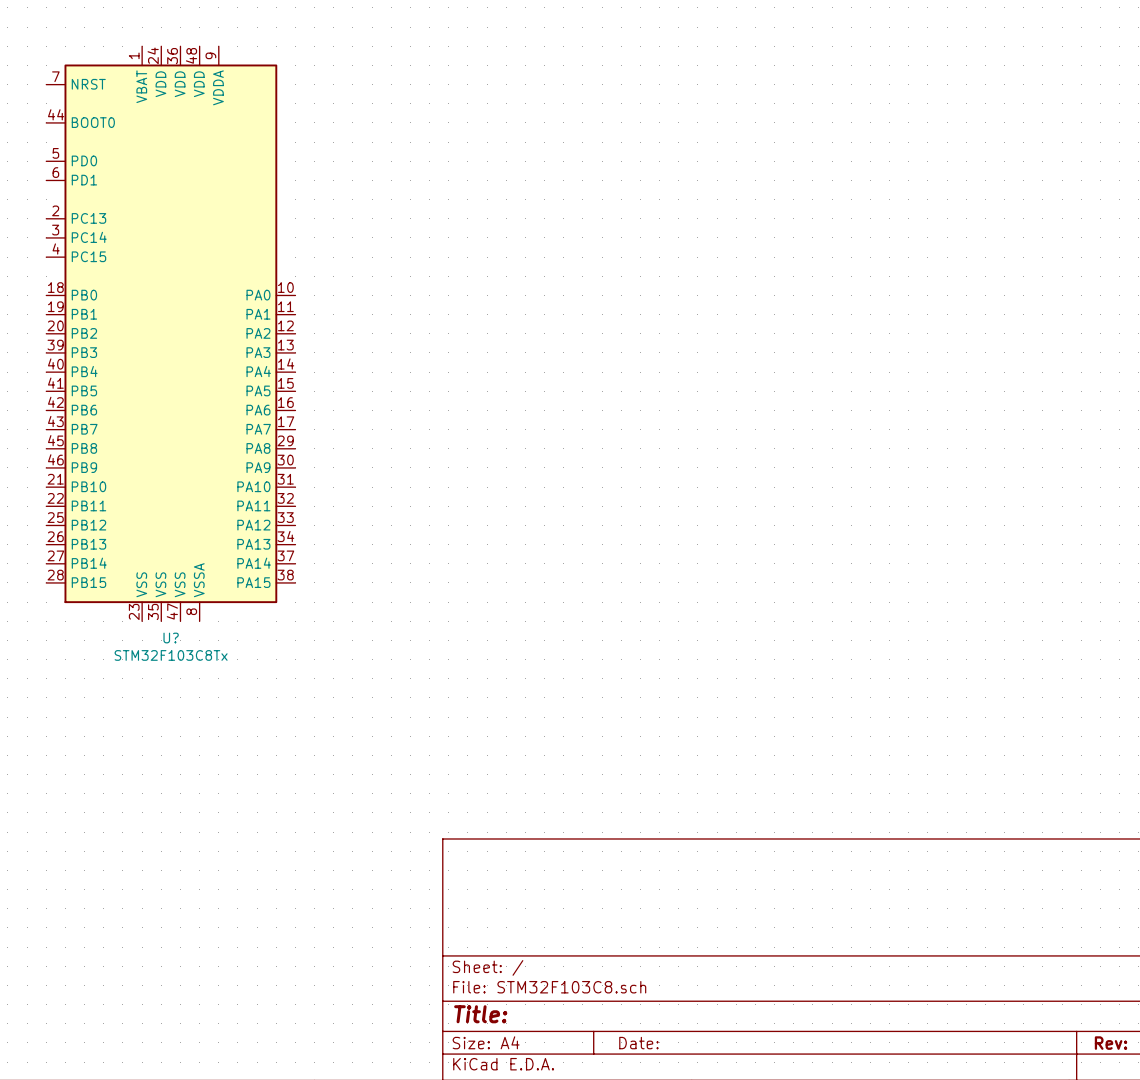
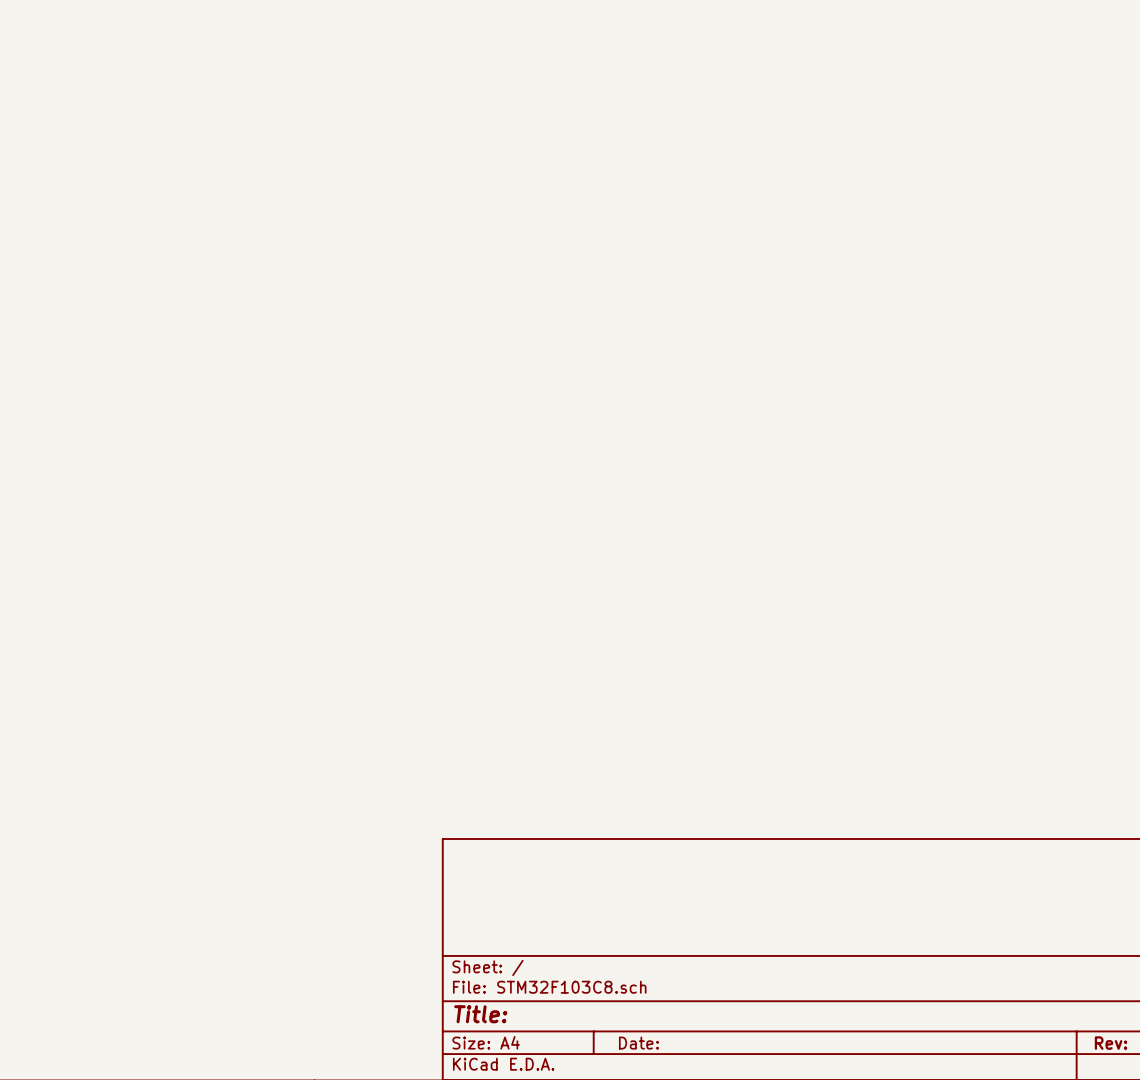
U?: STM32F103C8Tx (170, 333) -> none

